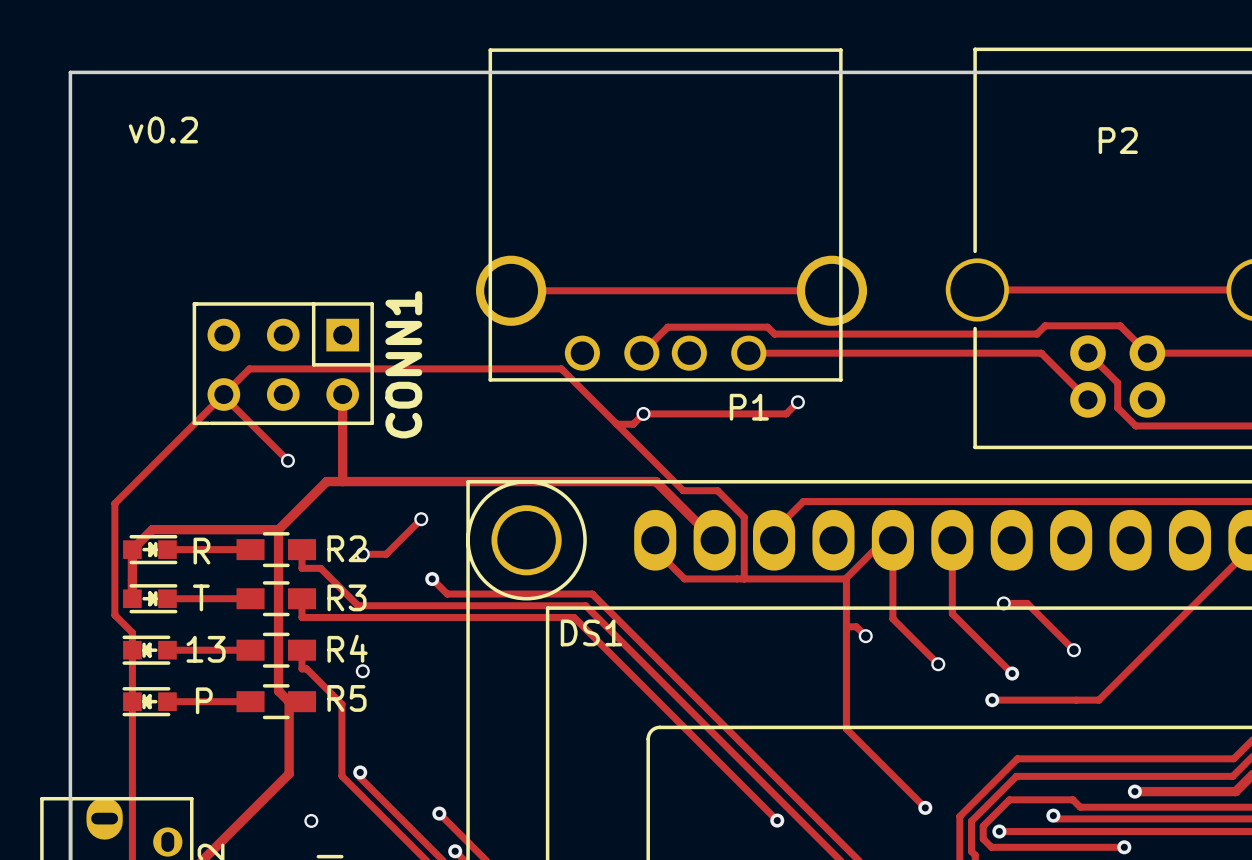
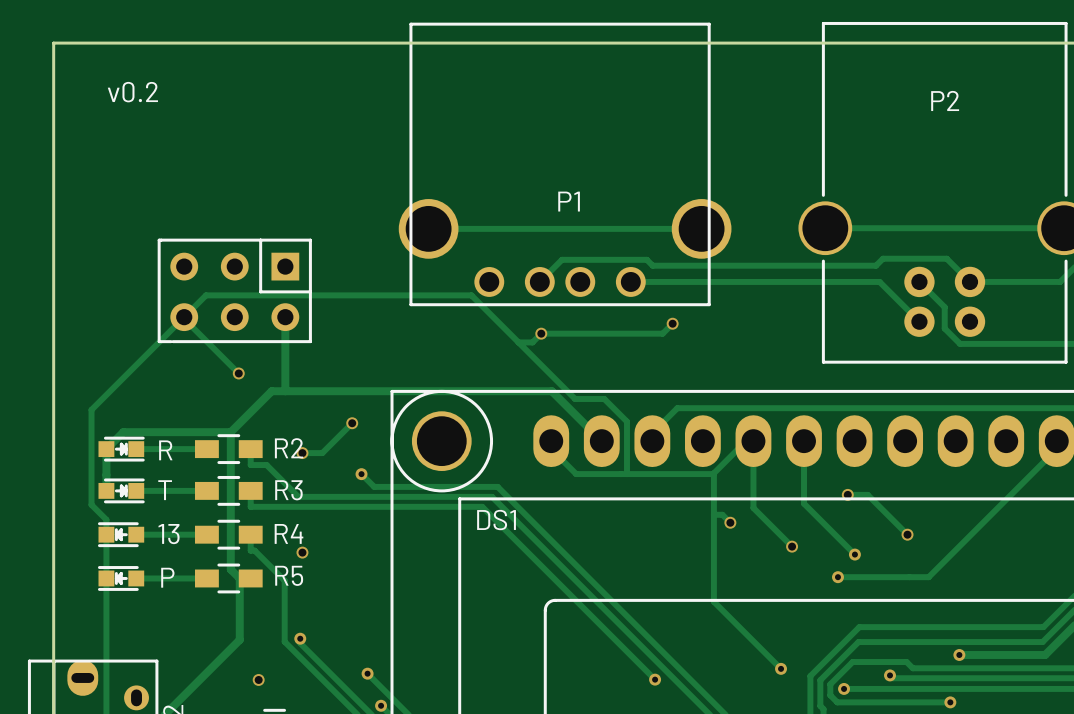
CONN1 name: CONN1 (403, 364) -> none
P1 name position: P1 (749, 407) -> P1 (569, 201)

